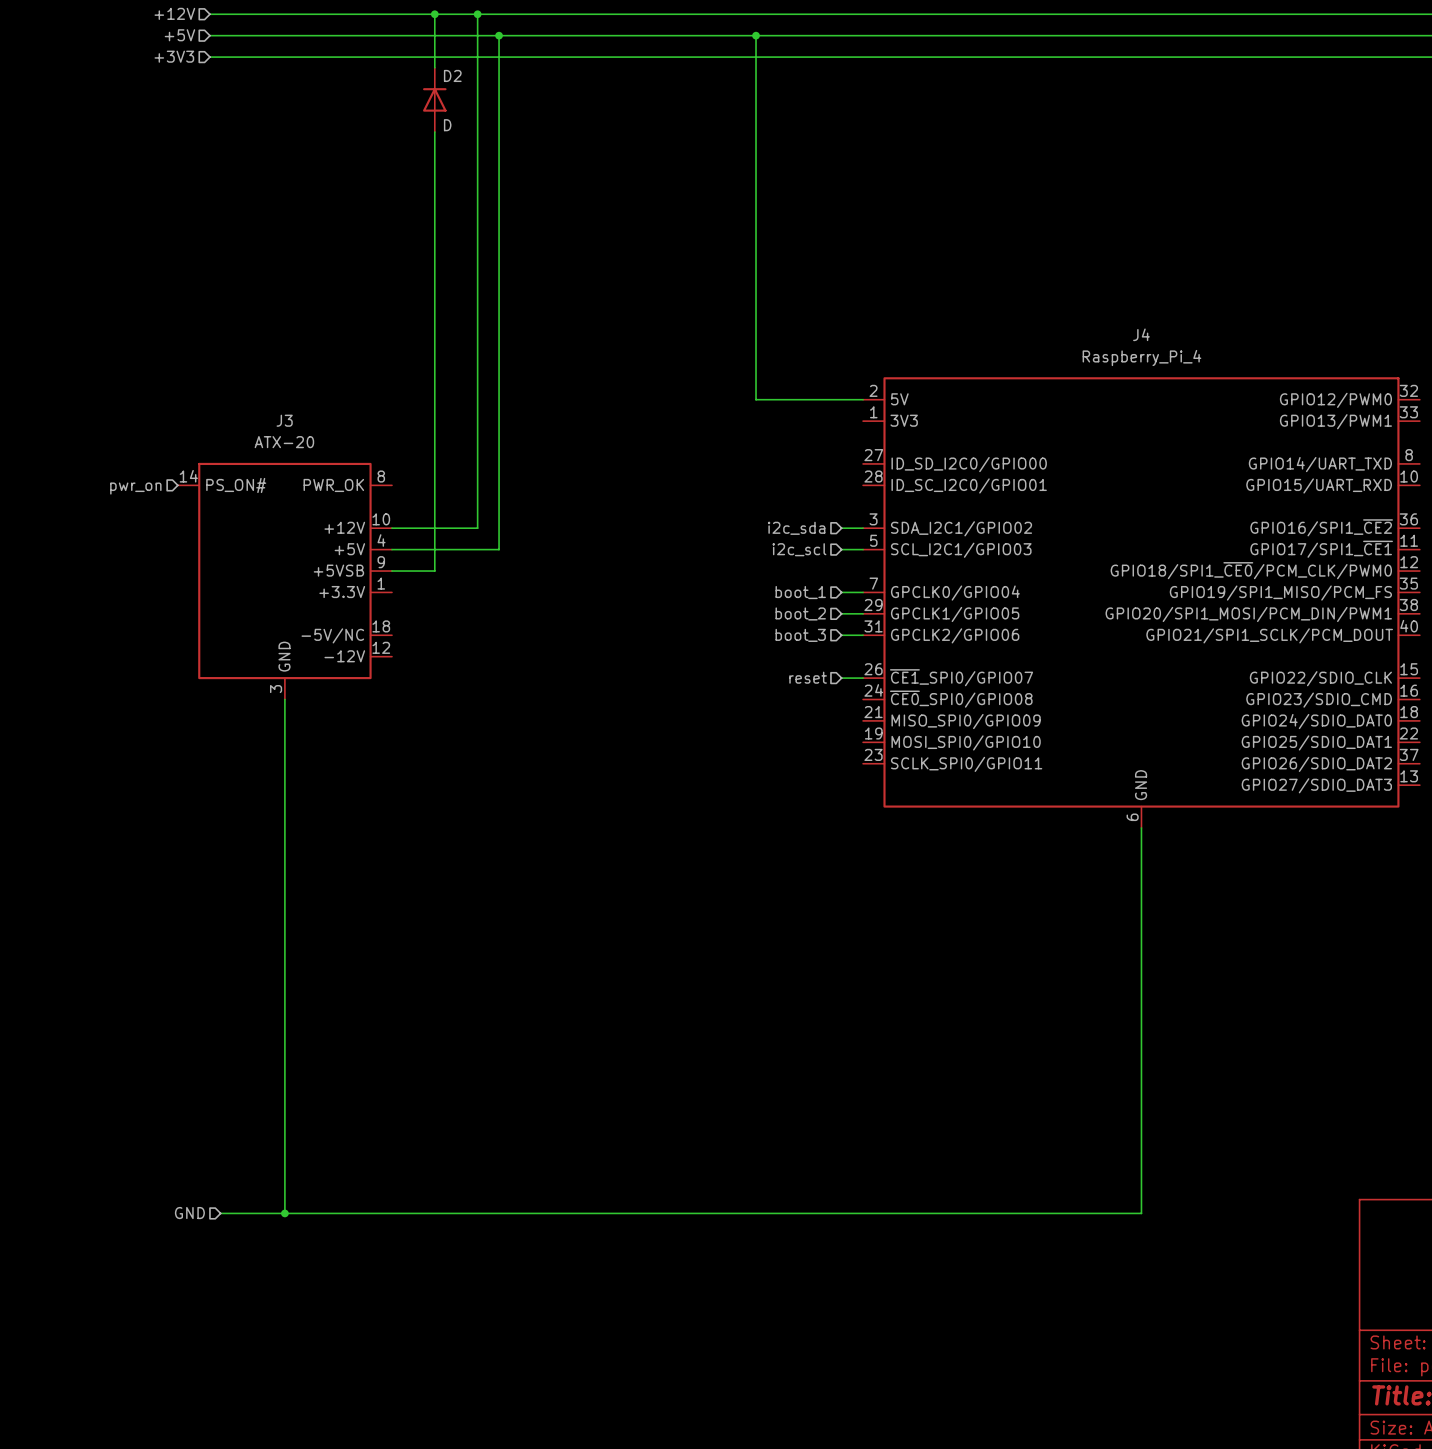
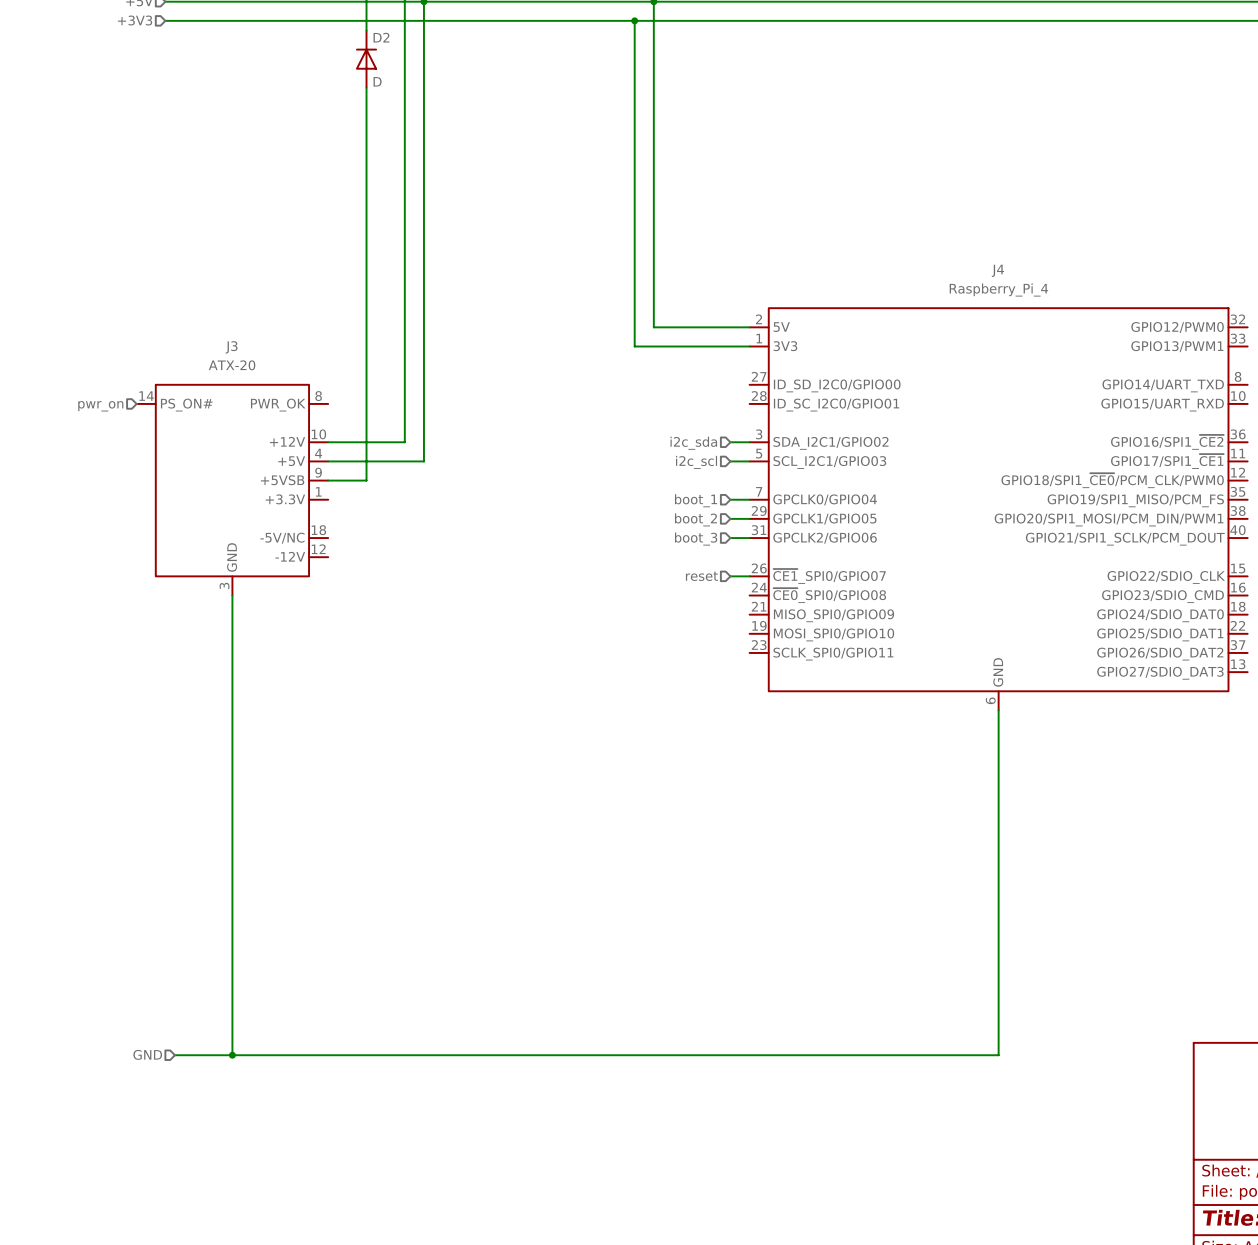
wire: none -> (634, 20) (634, 346) (749, 346)
junction: none -> (634, 20)

